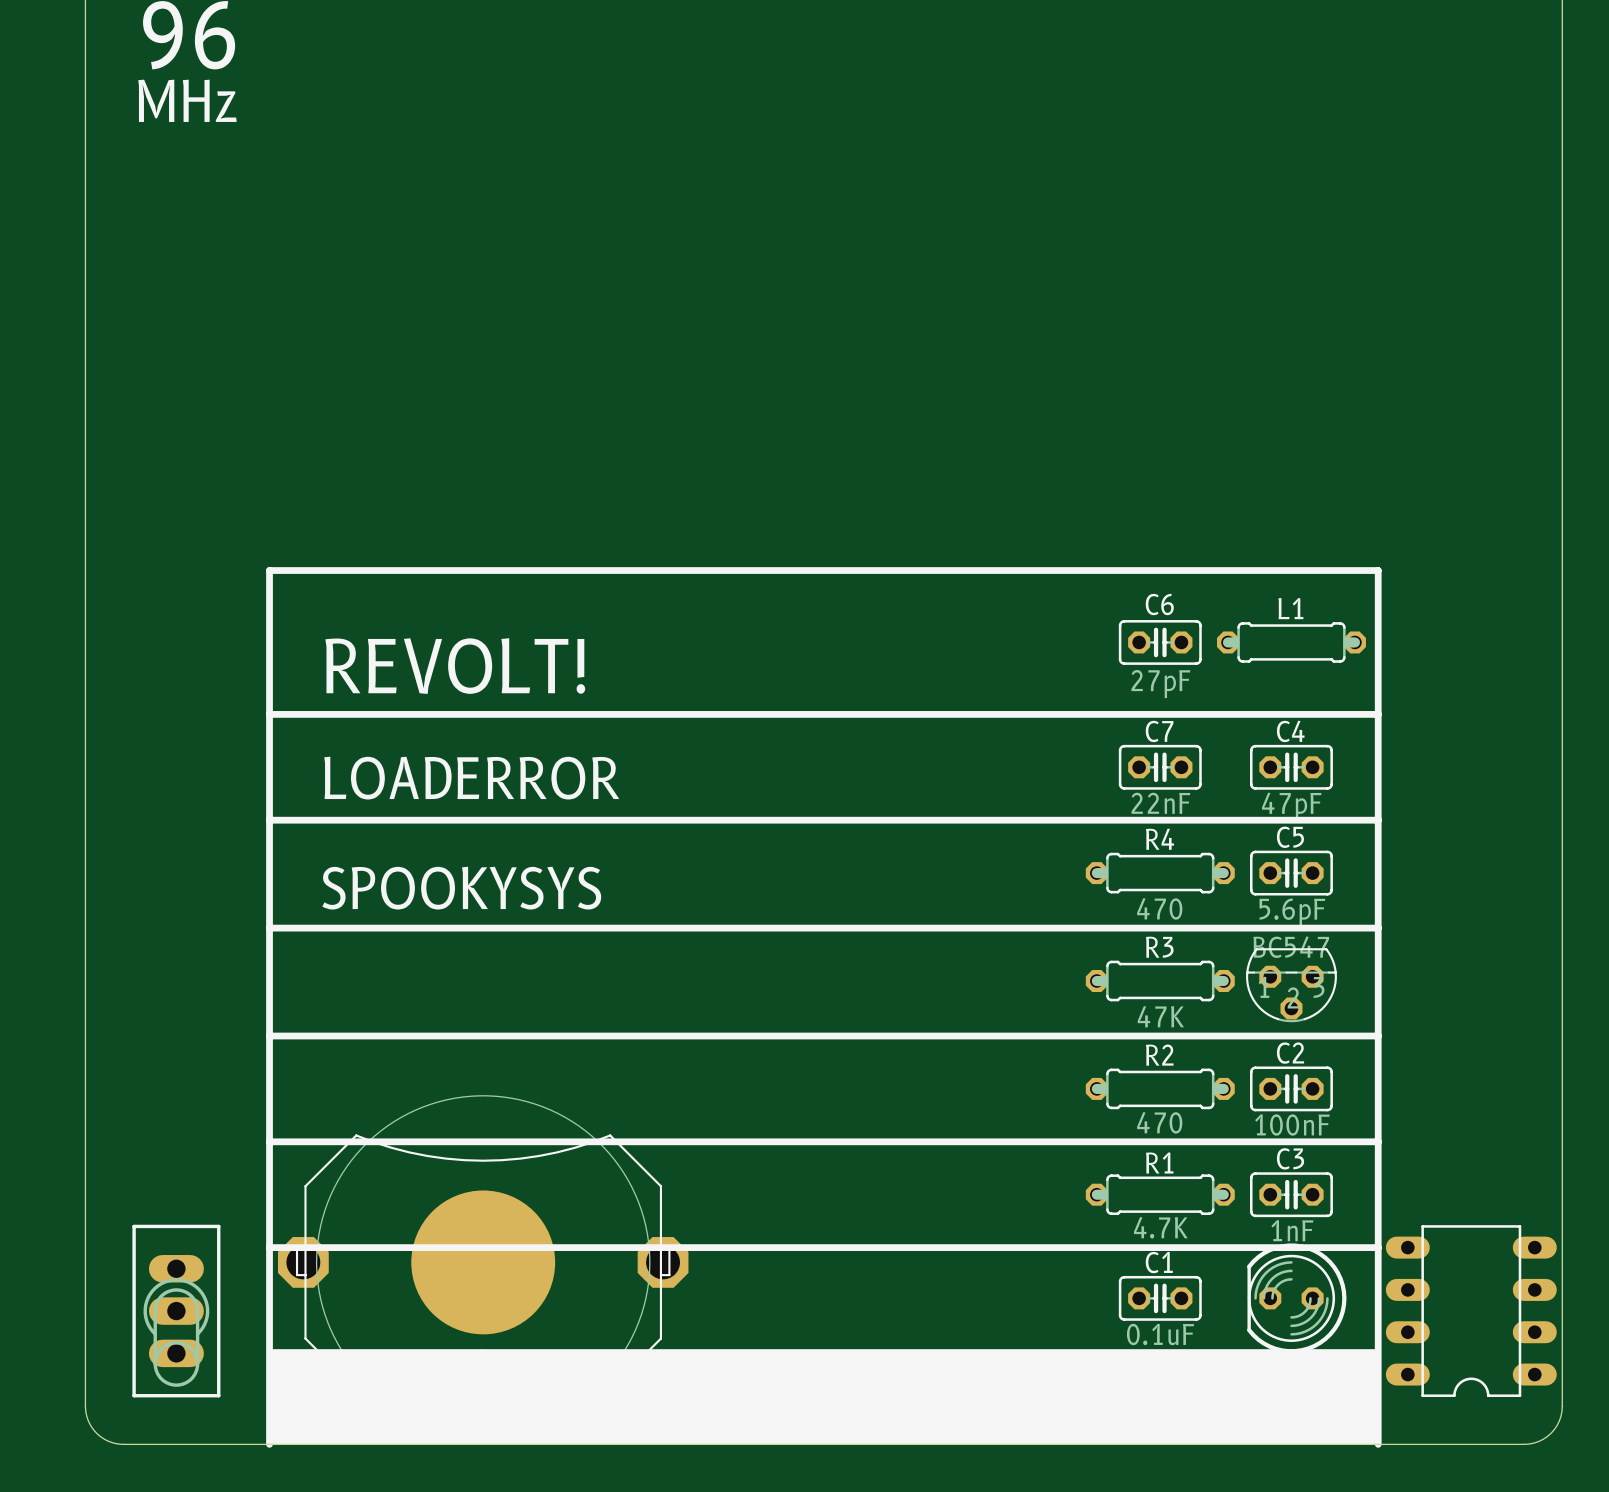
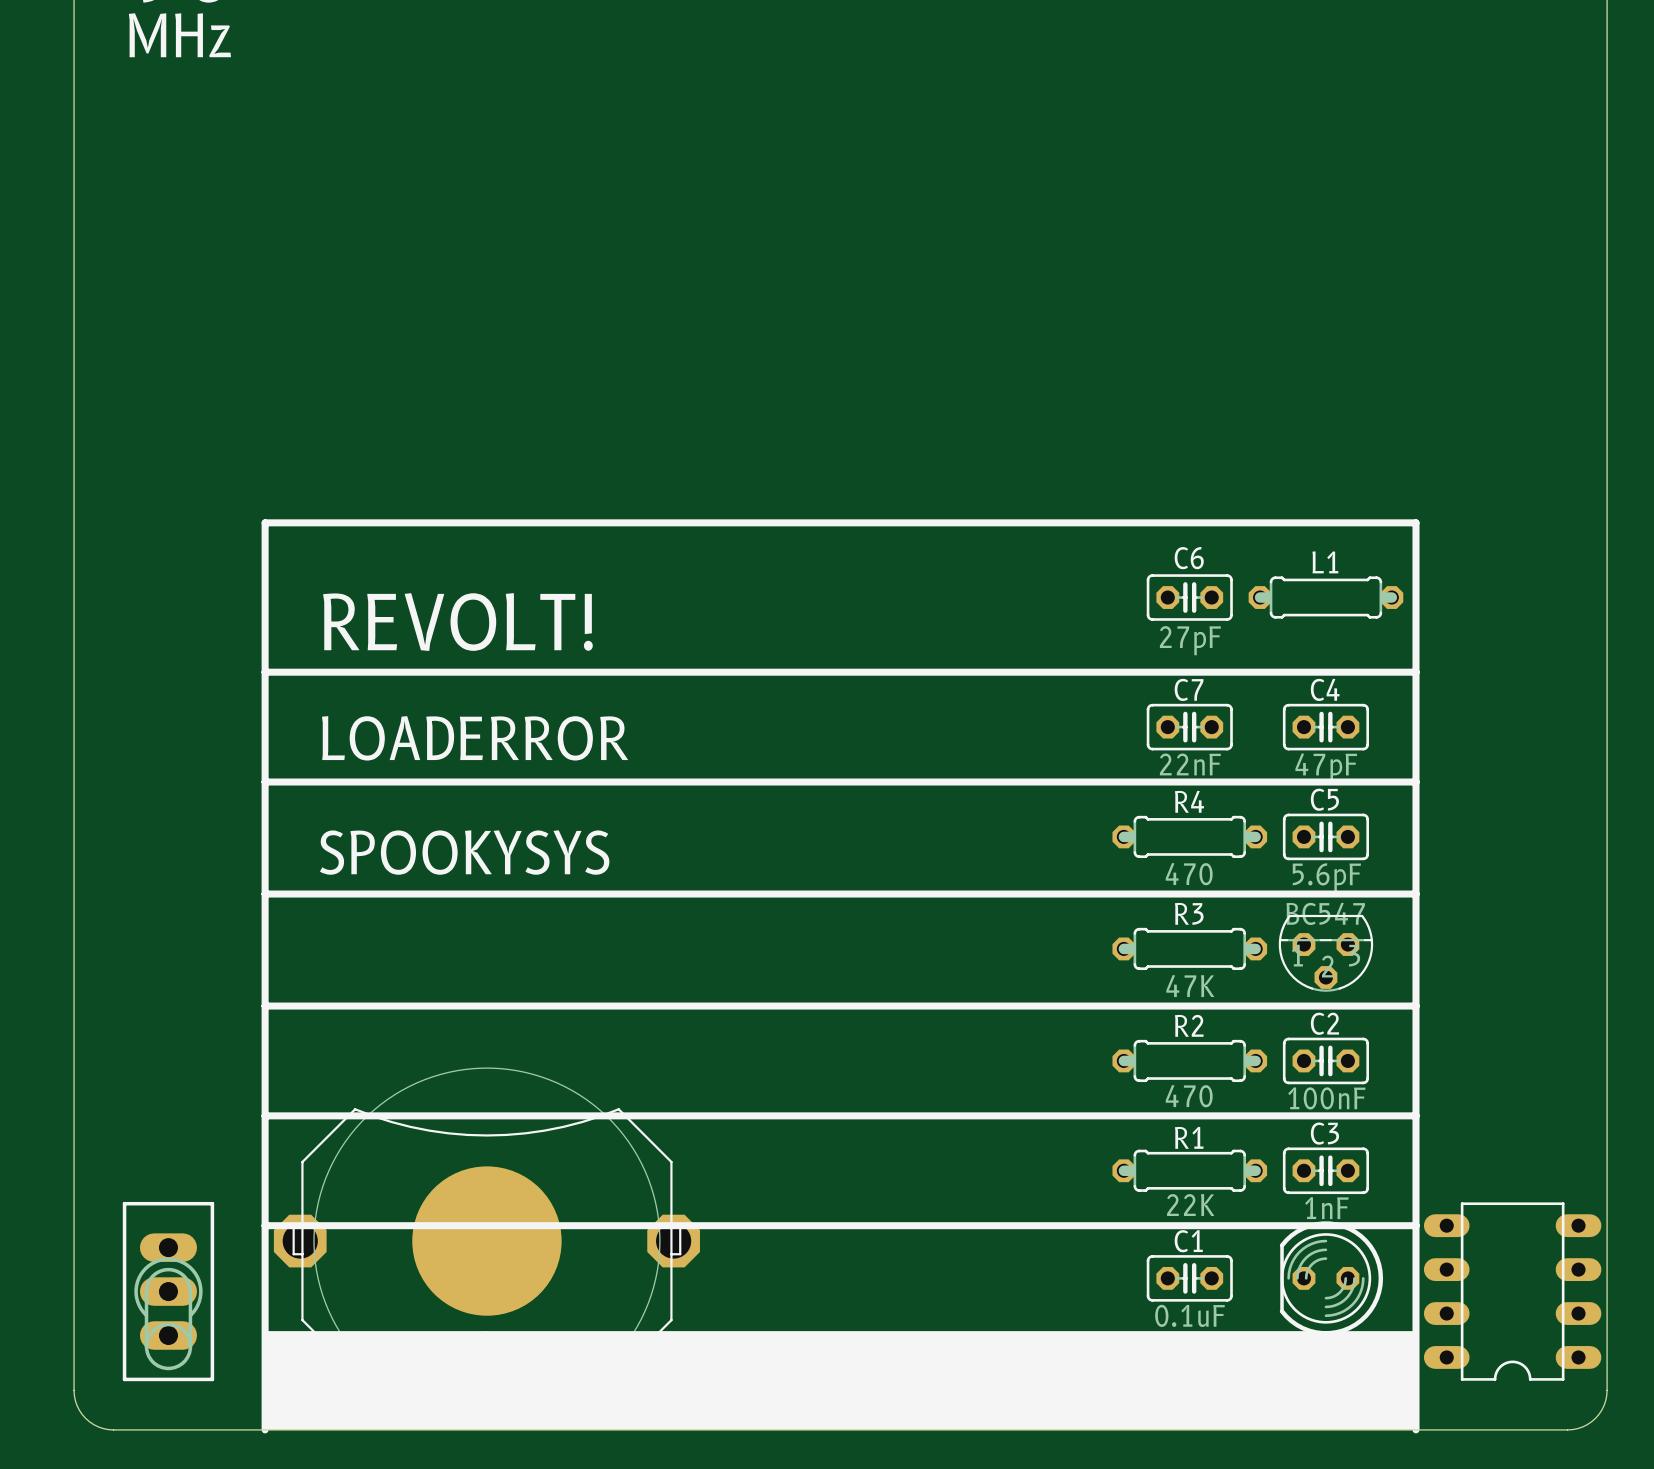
R1 value: 4.7K (1160, 1227) -> 22K (1190, 1205)

